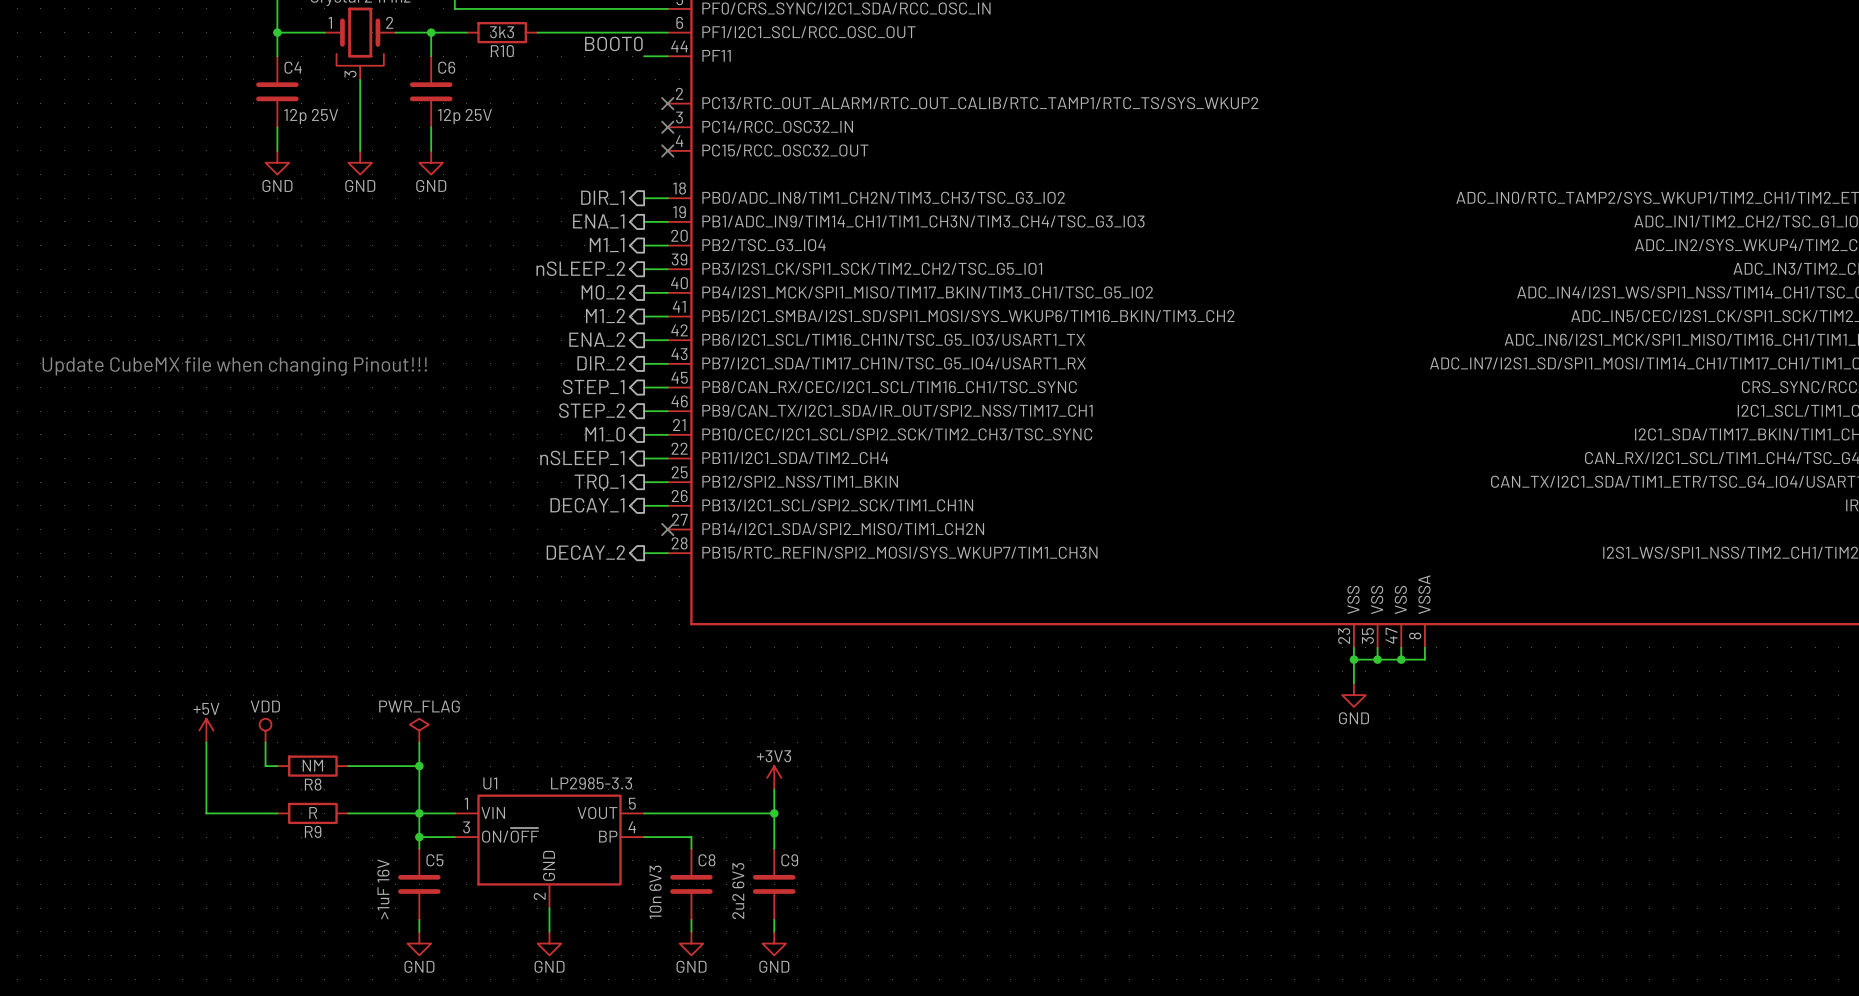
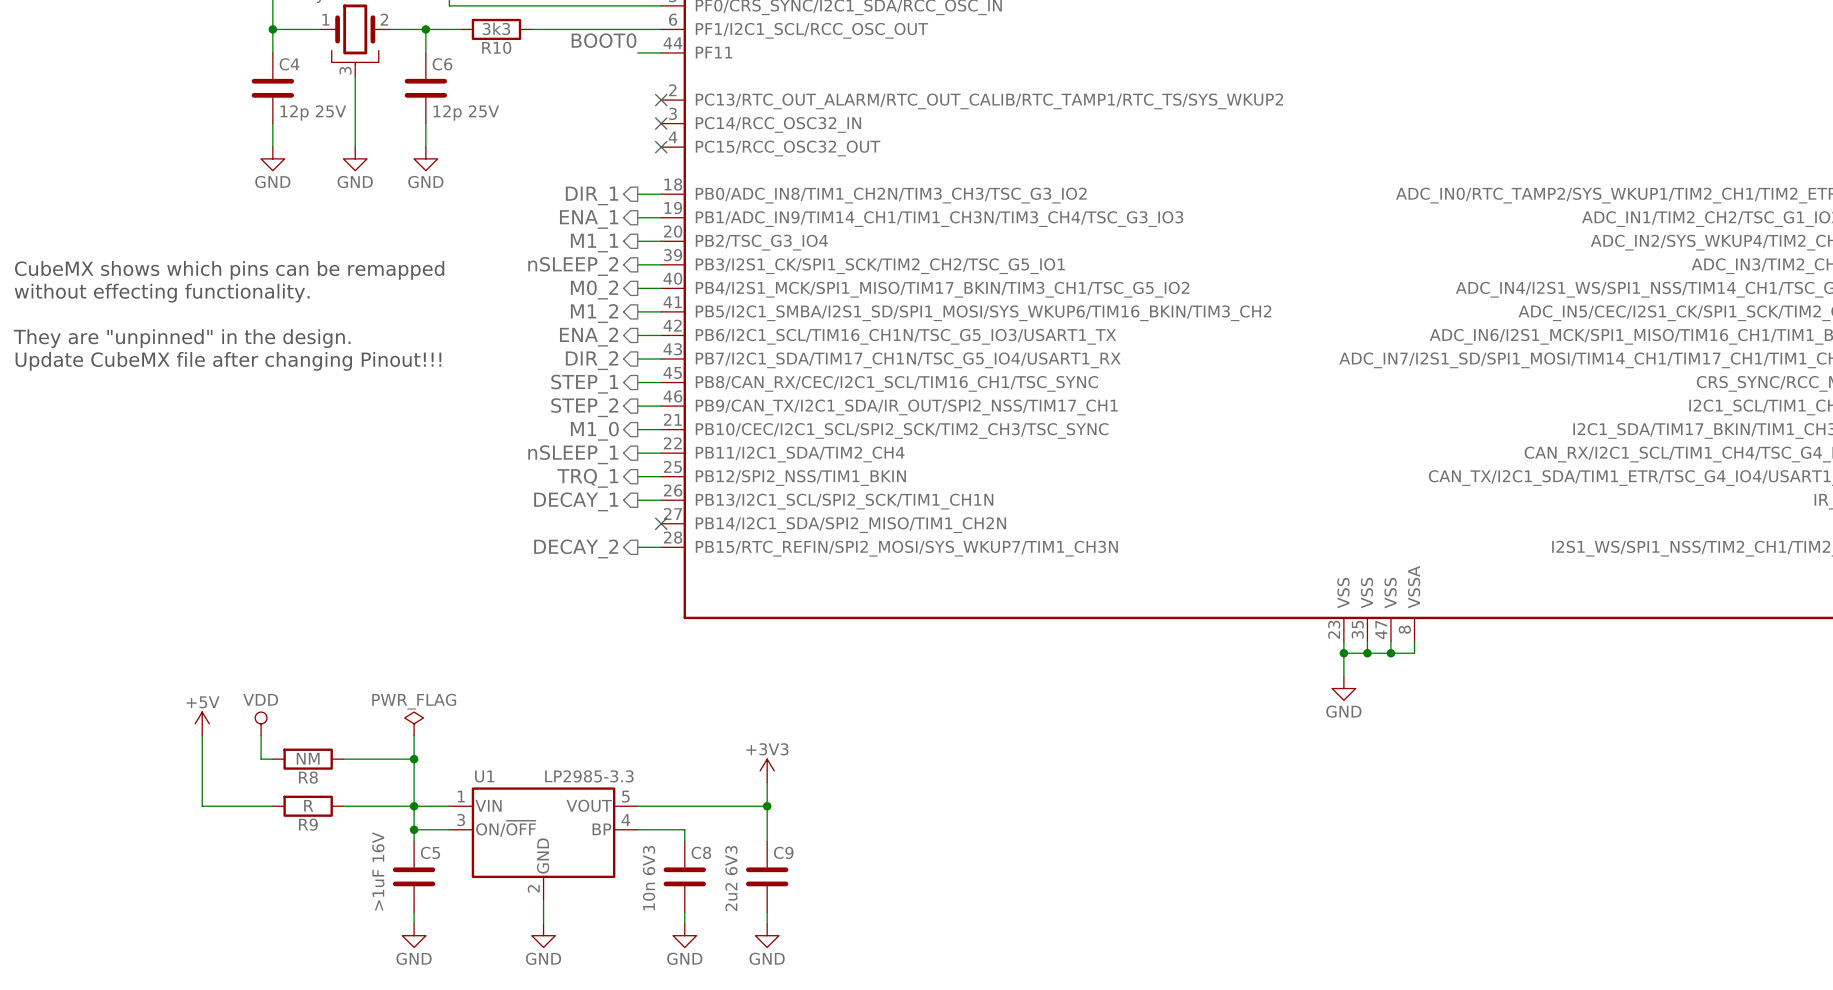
text: none -> CubeMX shows which pins can be remapped (229, 270)
text: none -> without effecting functionality. (162, 293)
text: none -> They are "unpinned" in the design. (182, 338)
text: Update CubeMX file when changing Pinout!!! (234, 366) -> Update CubeMX file after changing Pinout!!! (228, 361)

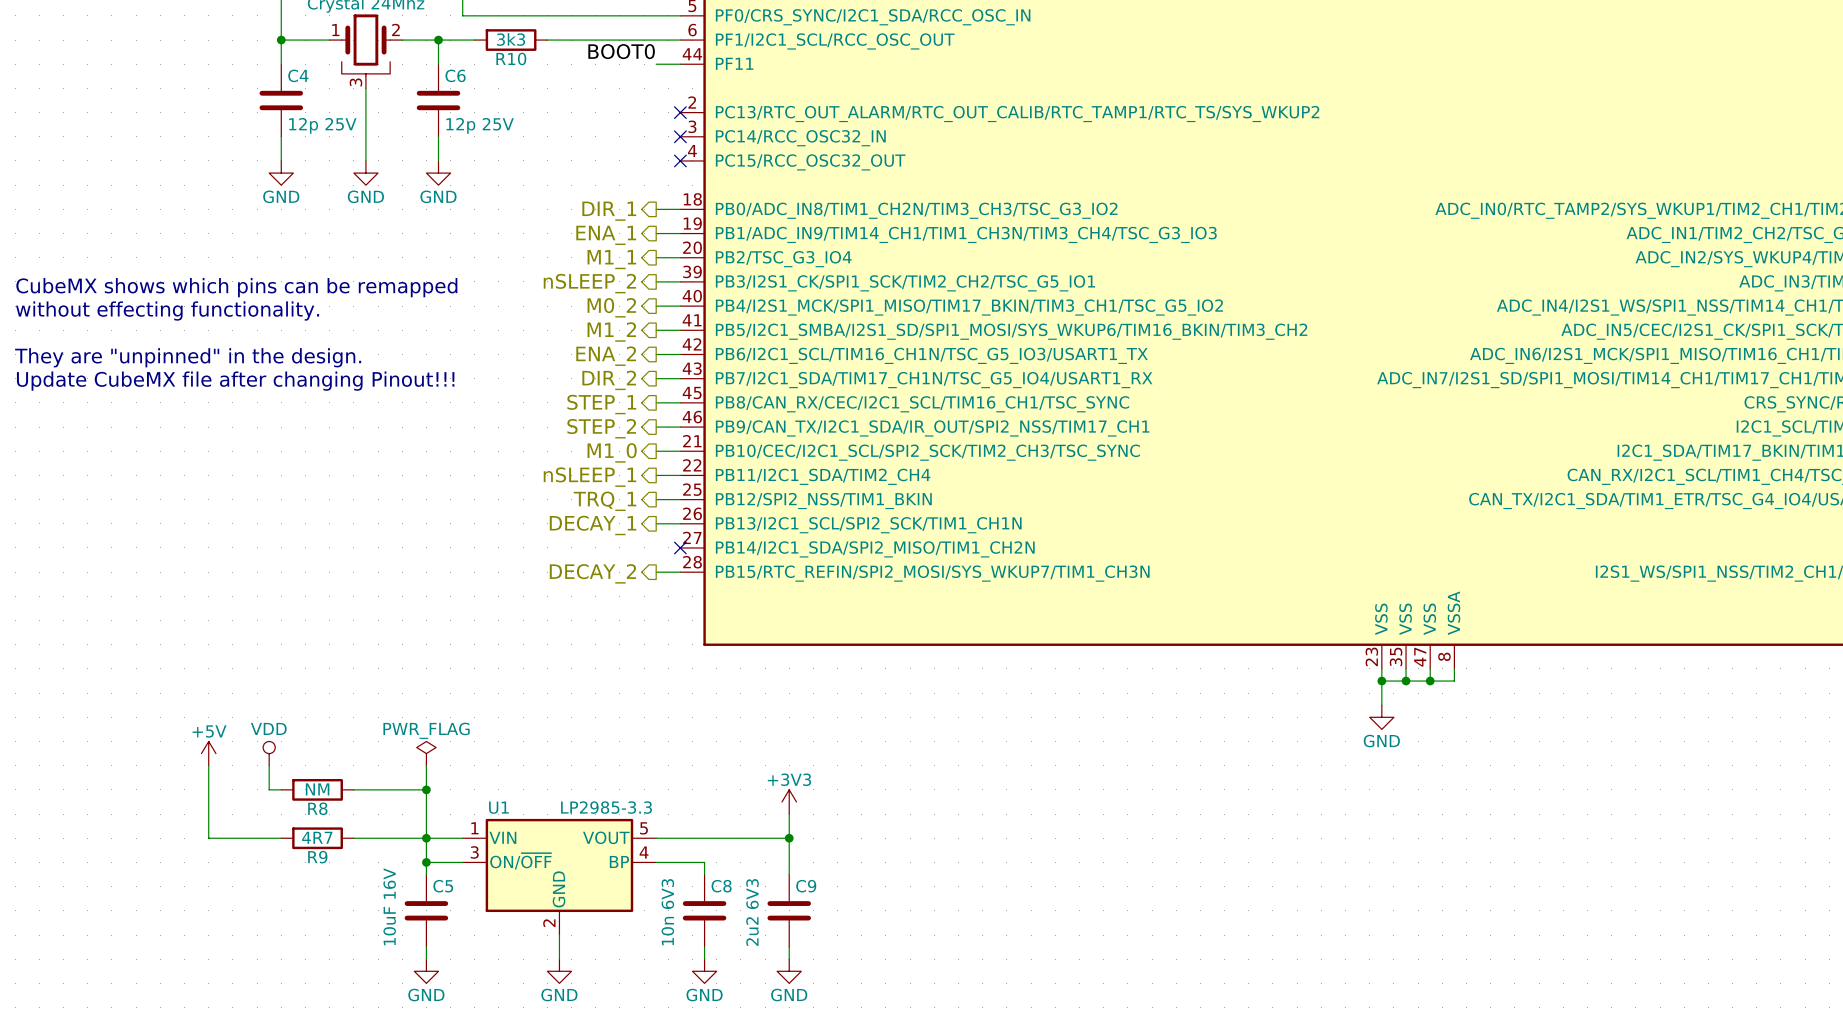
R9 value: R (308, 805) -> 4R7 (317, 837)
C5 value: >1uF 16V (378, 871) -> 10uF 16V (389, 906)

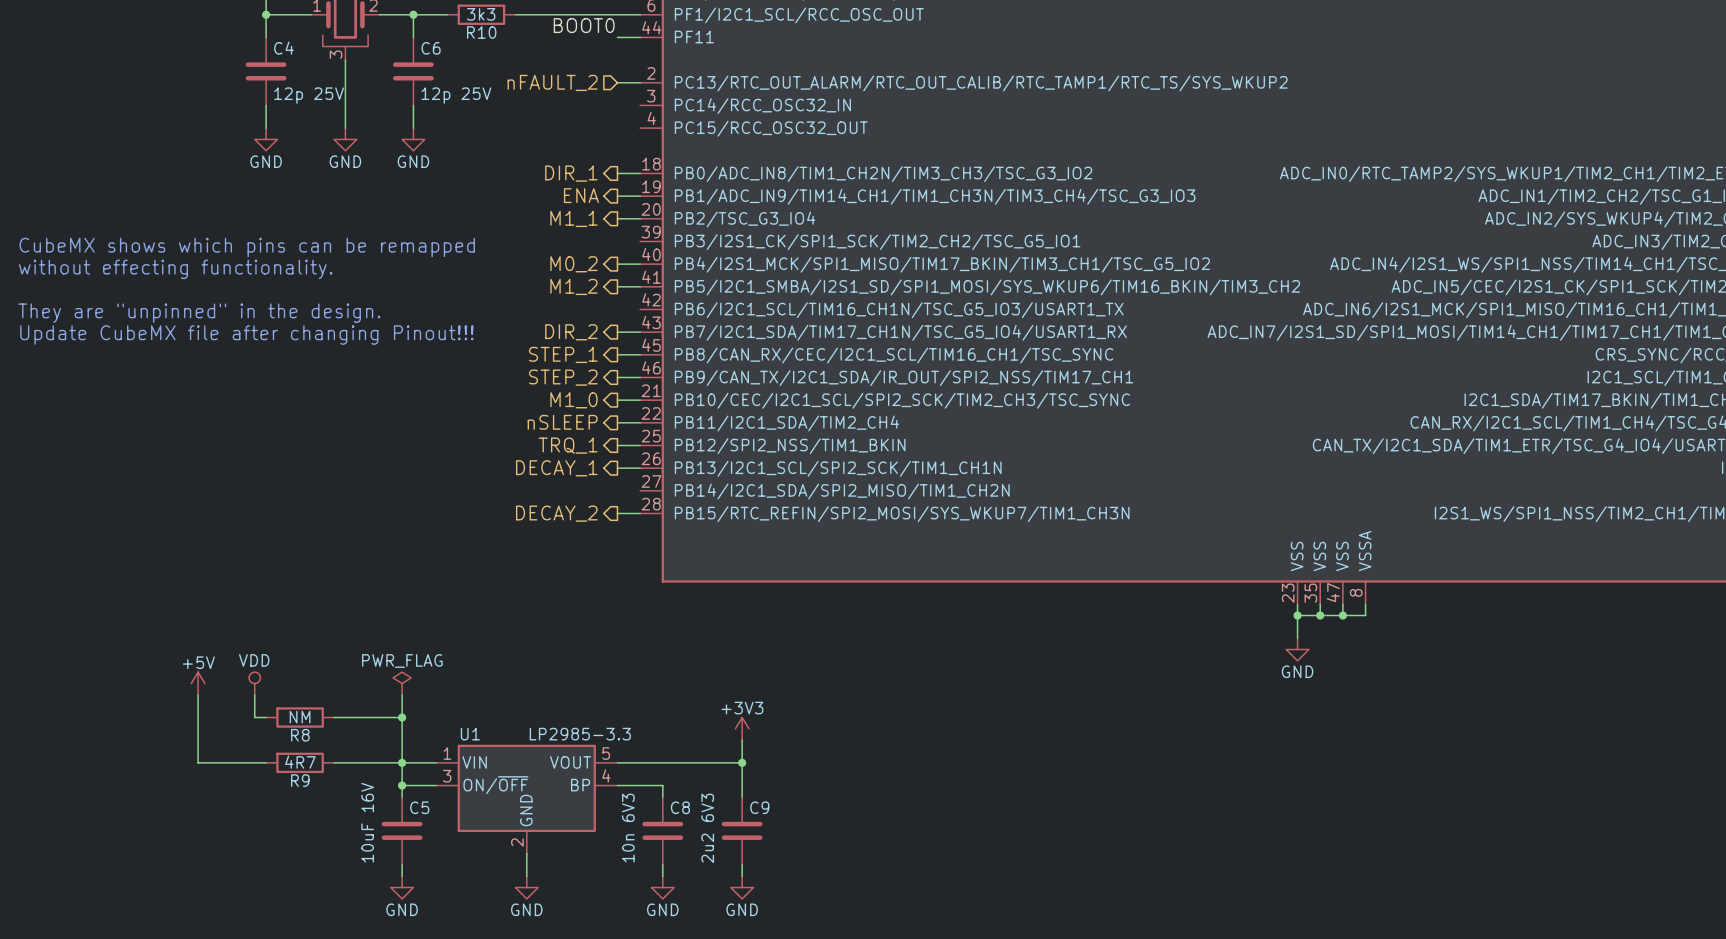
no-connect mark: (680, 112) -> none
hierarchical label: none -> nFAULT_2 (552, 82)
no-connect mark: (680, 136) -> none
no-connect mark: (680, 160) -> none
hierarchical label: ENA_1 (606, 235) -> ENA (581, 195)
wire: (656, 281) (680, 281) -> (617, 82) (640, 82)
hierarchical label: nSLEEP_2 (589, 283) -> none
wire: (656, 354) (680, 354) -> none
hierarchical label: ENA_2 (606, 356) -> none
hierarchical label: nSLEEP_1 (589, 477) -> nSLEEP (562, 422)
no-connect mark: (680, 547) -> none

